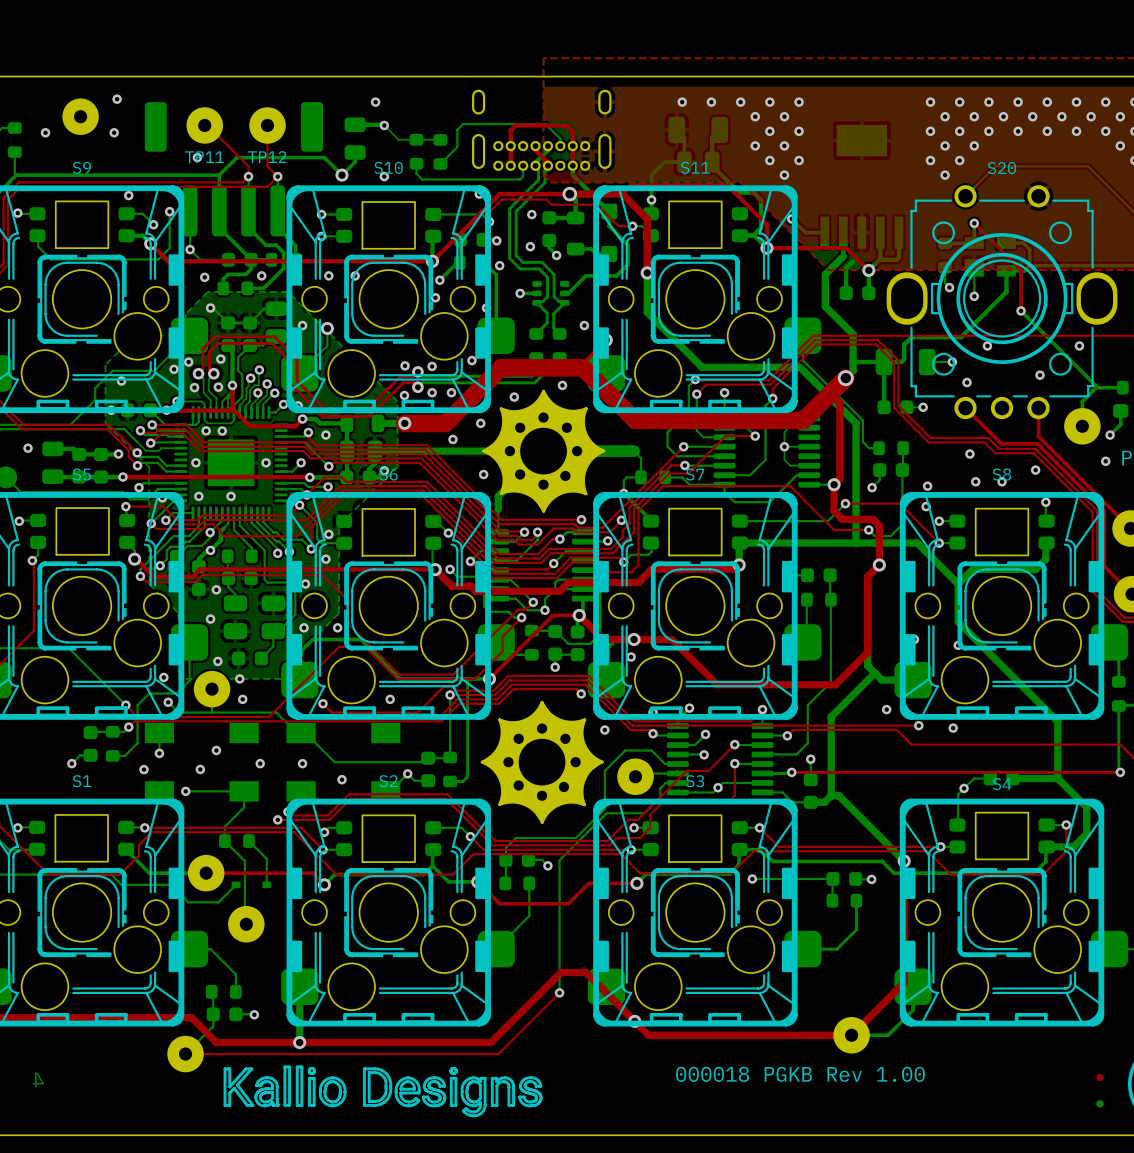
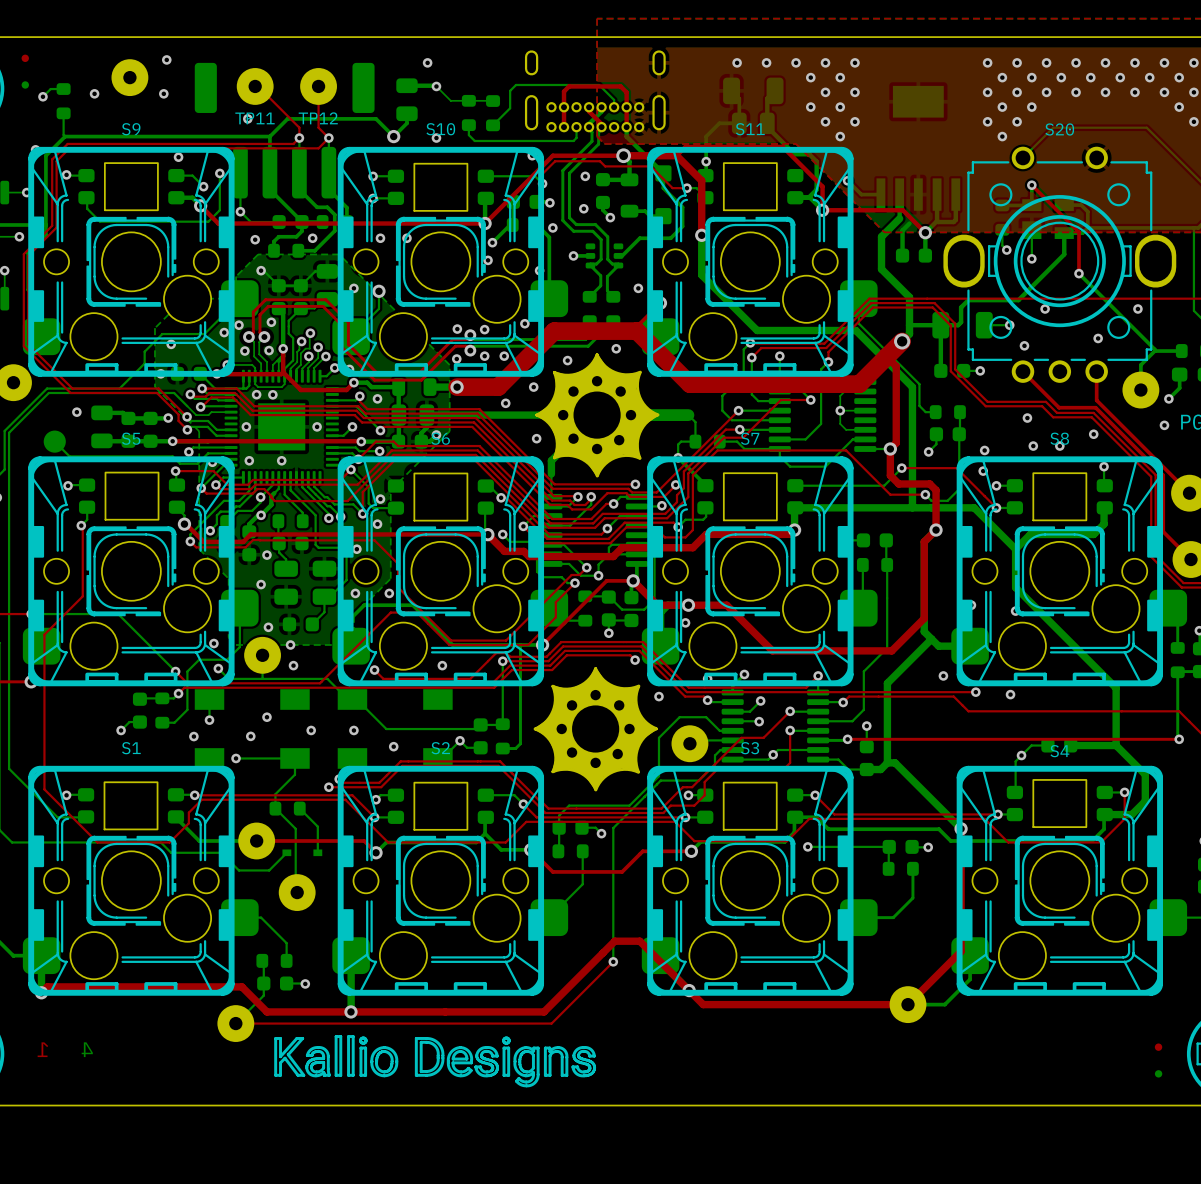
text: 000018 PGKB Rev 1.00 (800, 1074) -> none

